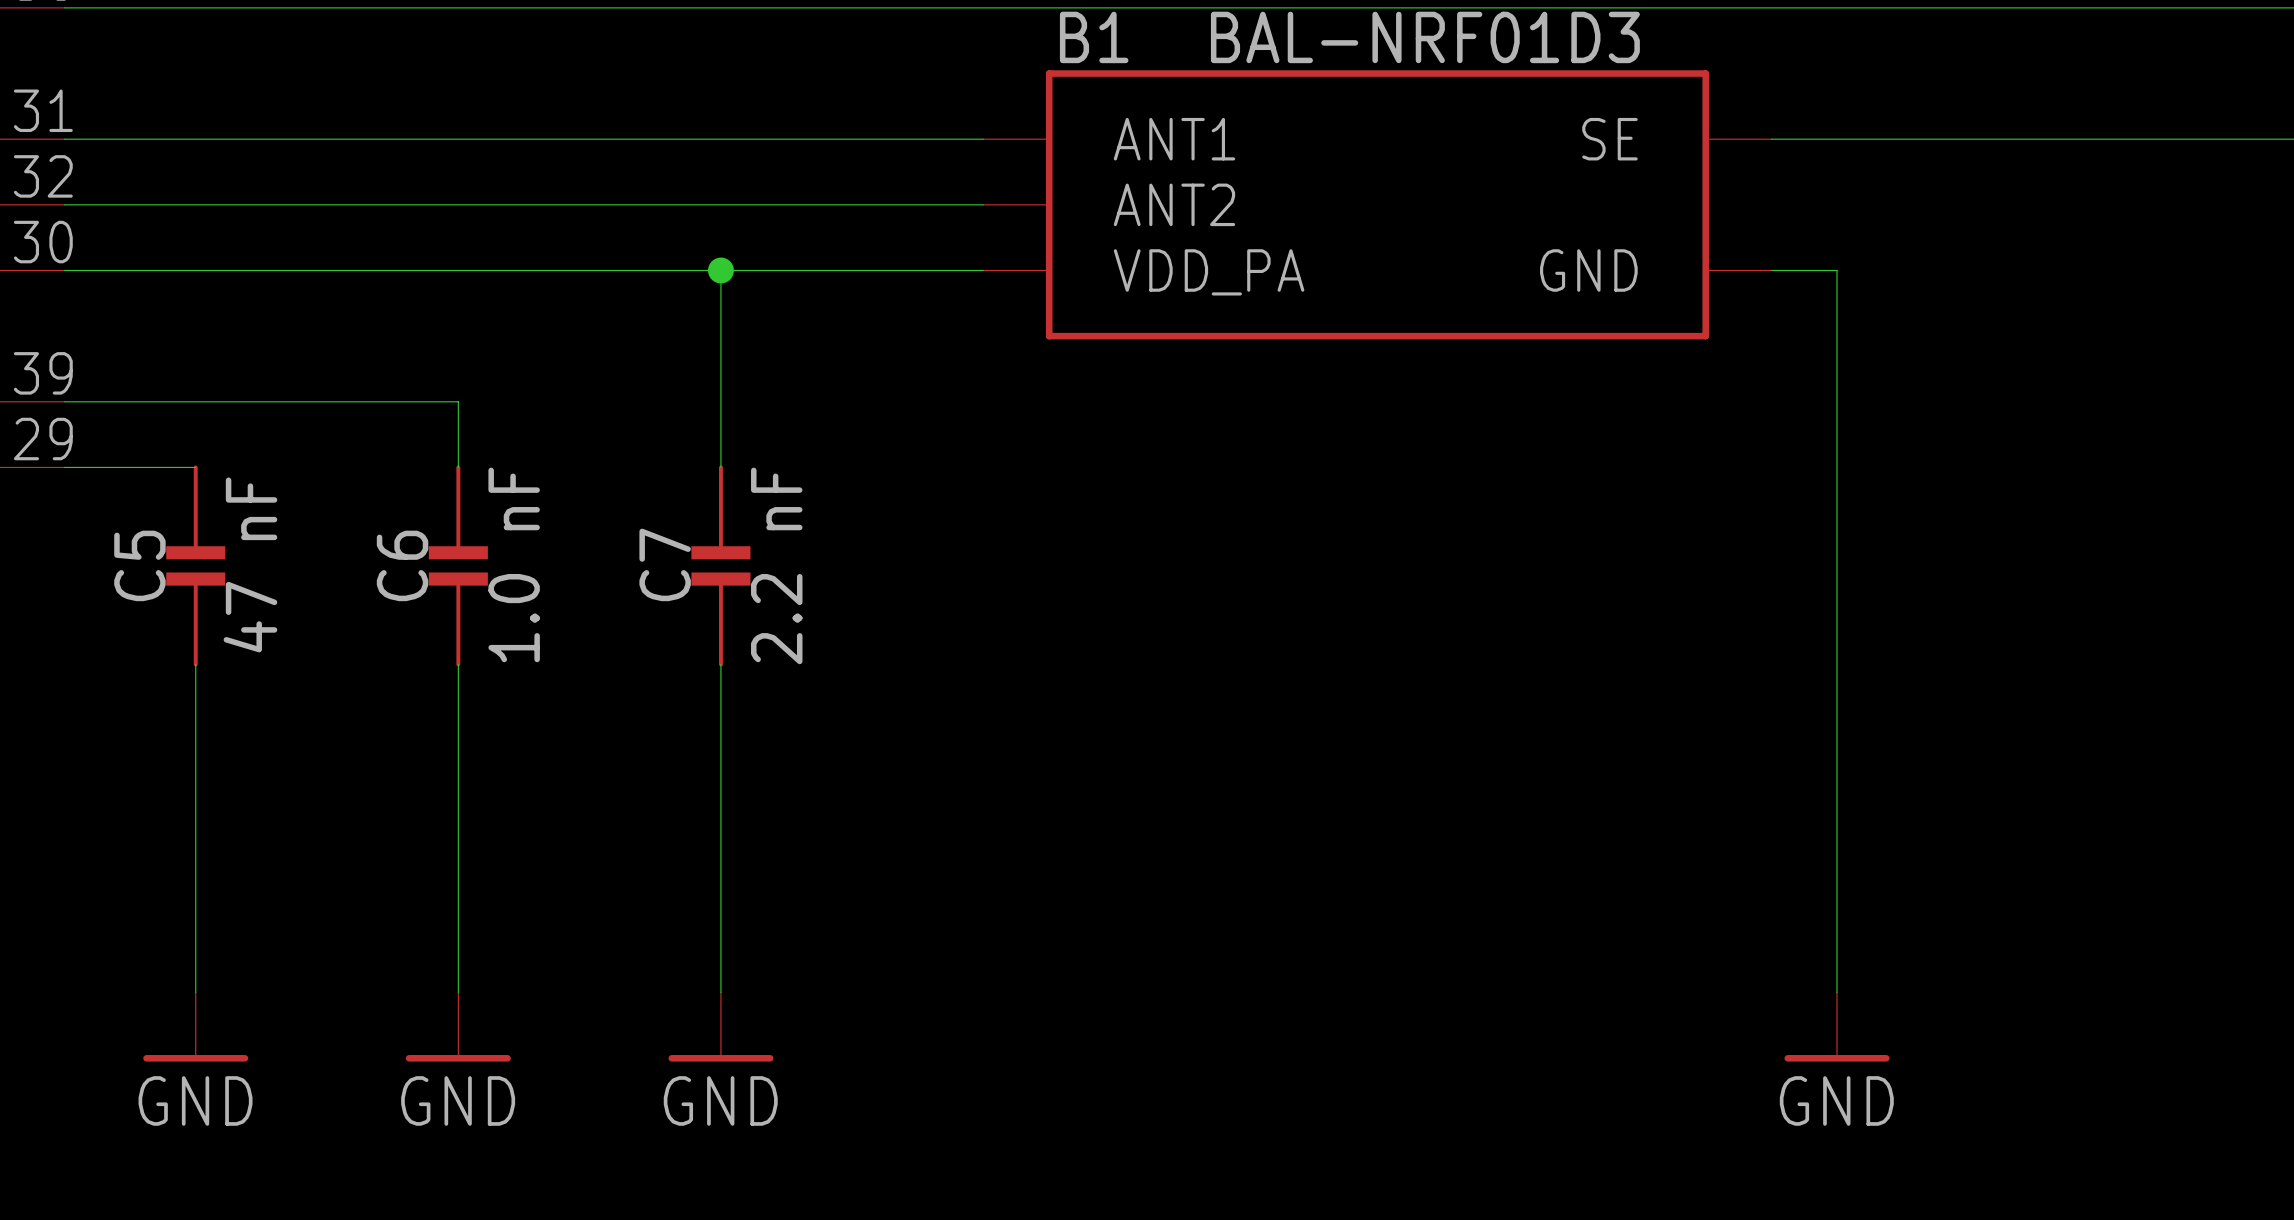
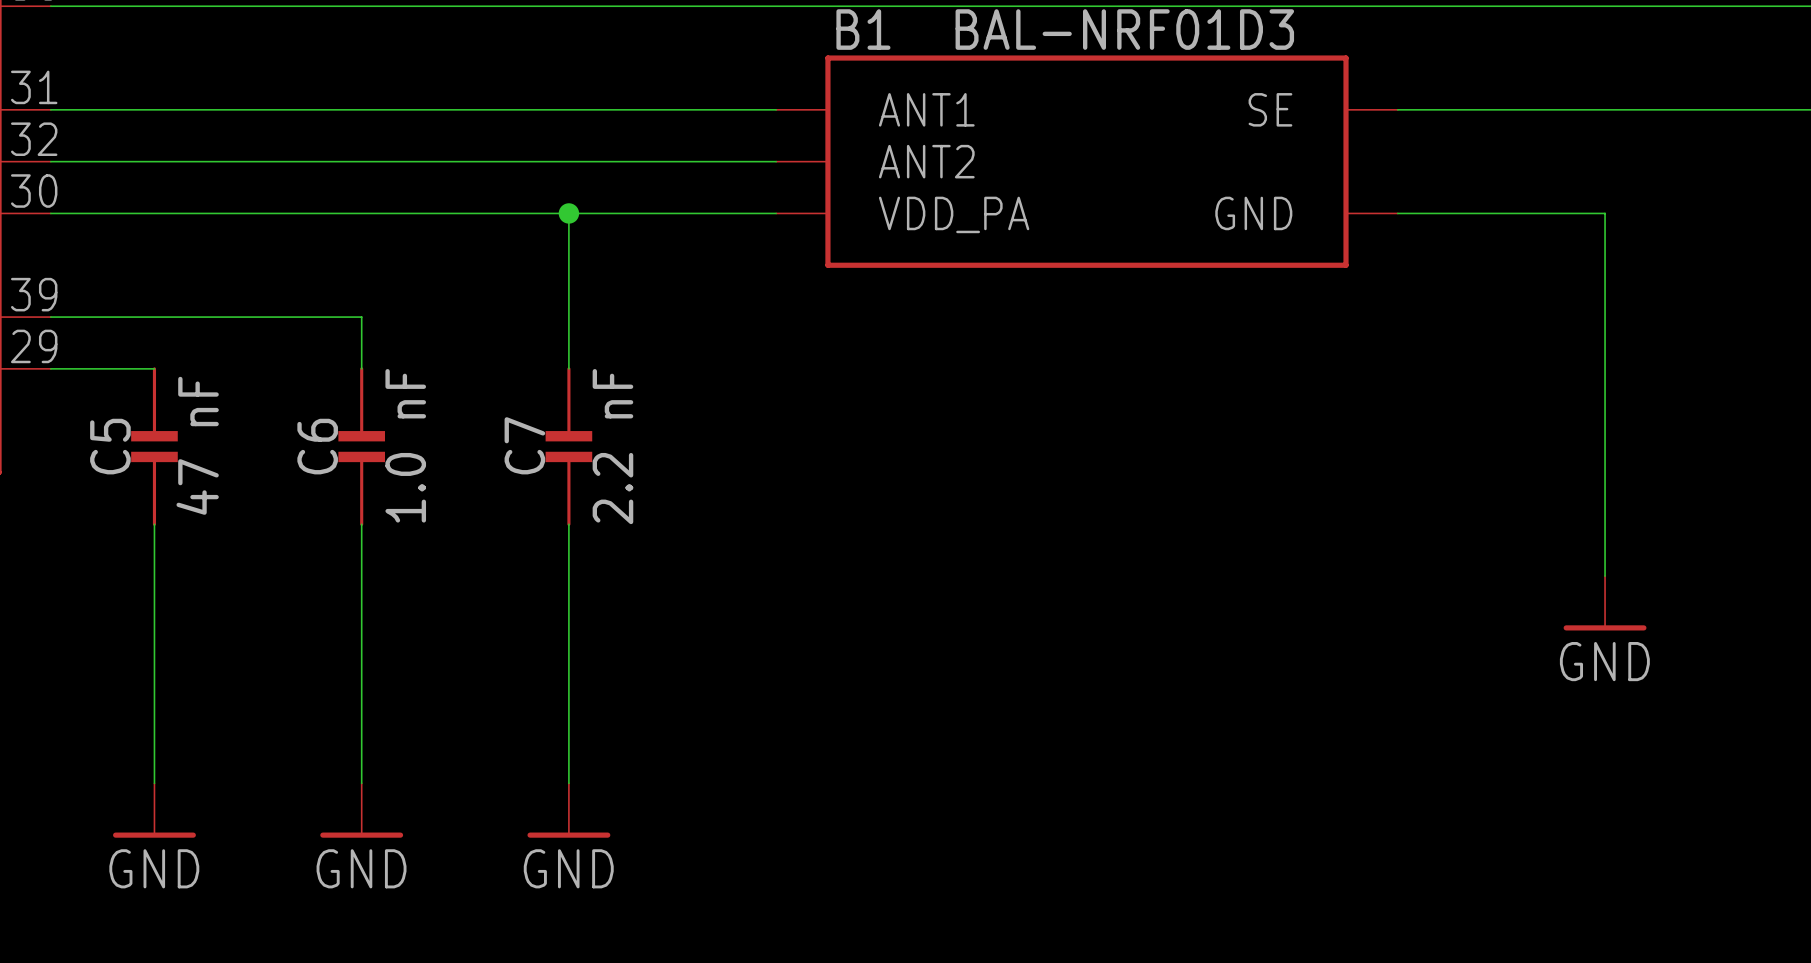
wire: (1837, 270) (1837, 992) -> (1449, 213) (1605, 213) (1605, 576)
power symbol position: GND (1837, 1027) -> GND (1605, 603)

